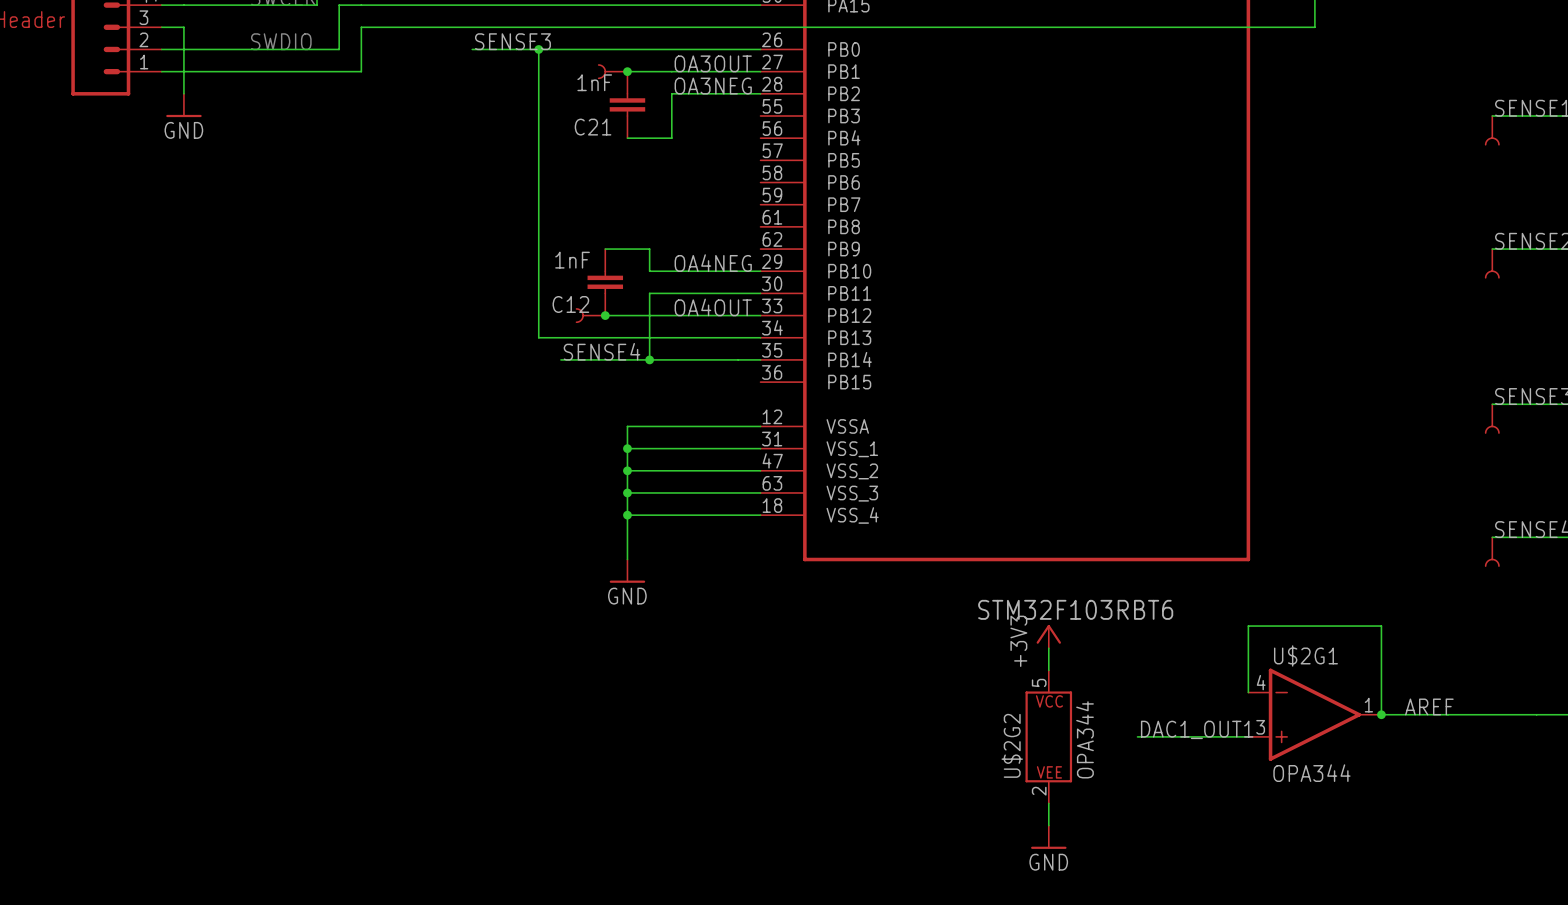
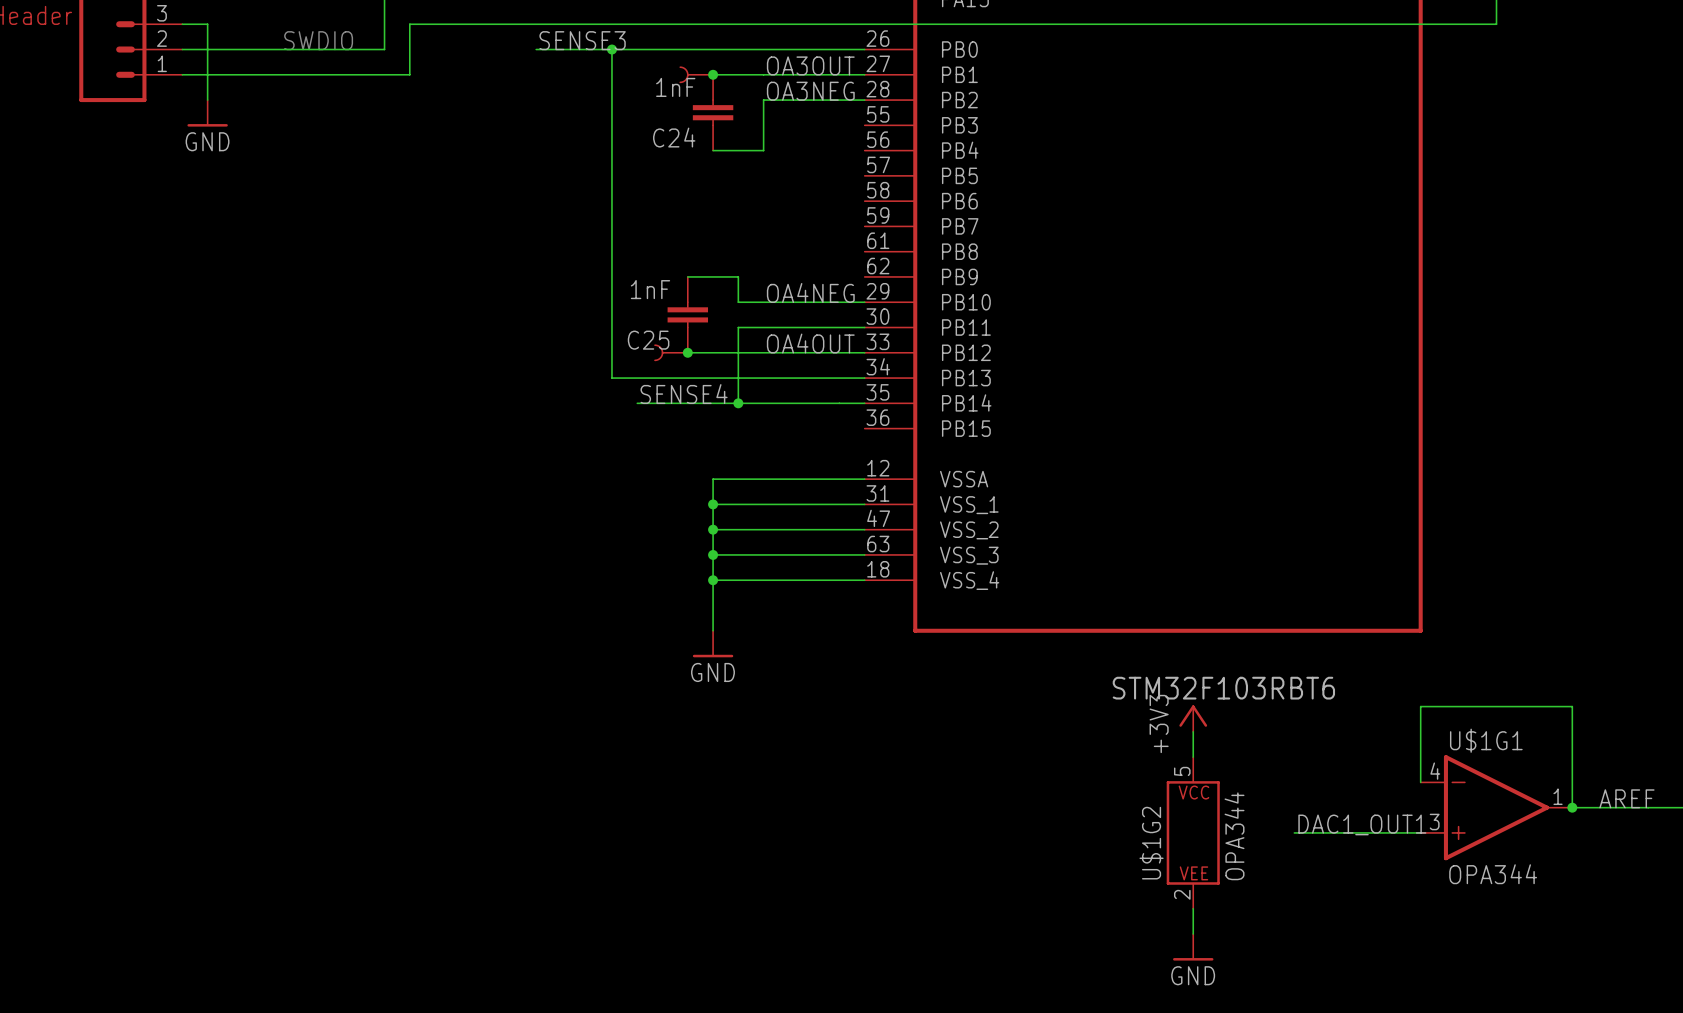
C21 name: C21 (593, 127) -> C24 (674, 137)
C12 name: C12 (570, 304) -> C25 (648, 340)
U$2G1 name: U$2G1 (1305, 655) -> U$1G1 (1486, 740)
U$2G2 name: U$2G2 (1012, 745) -> U$1G2 (1151, 843)

